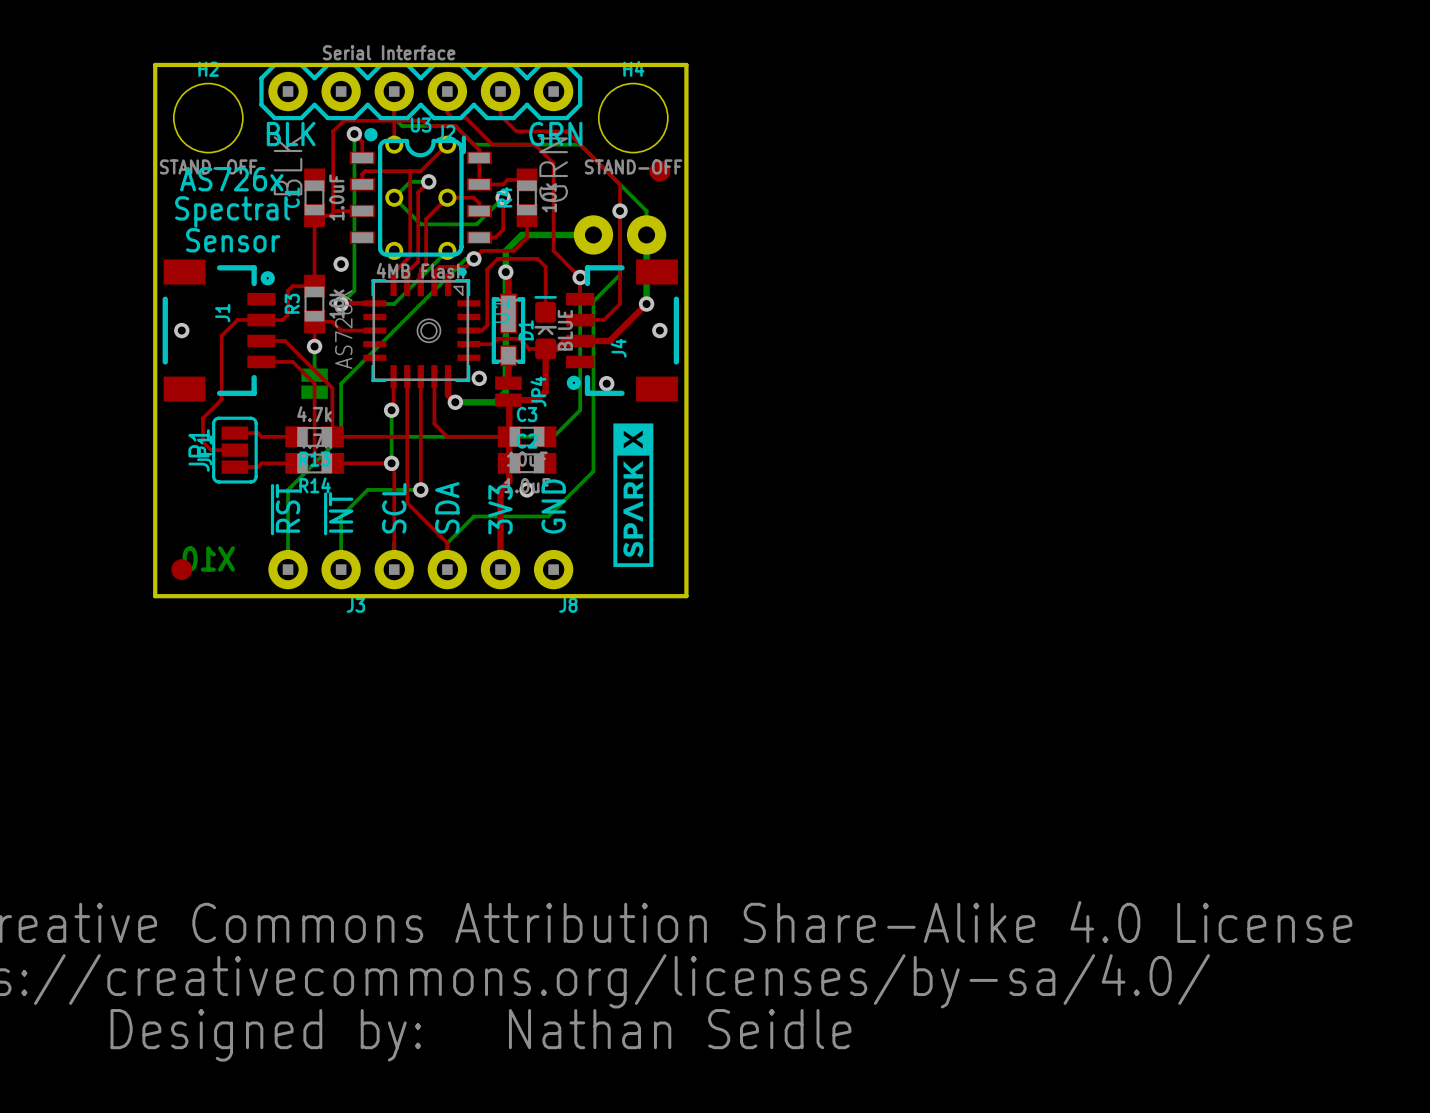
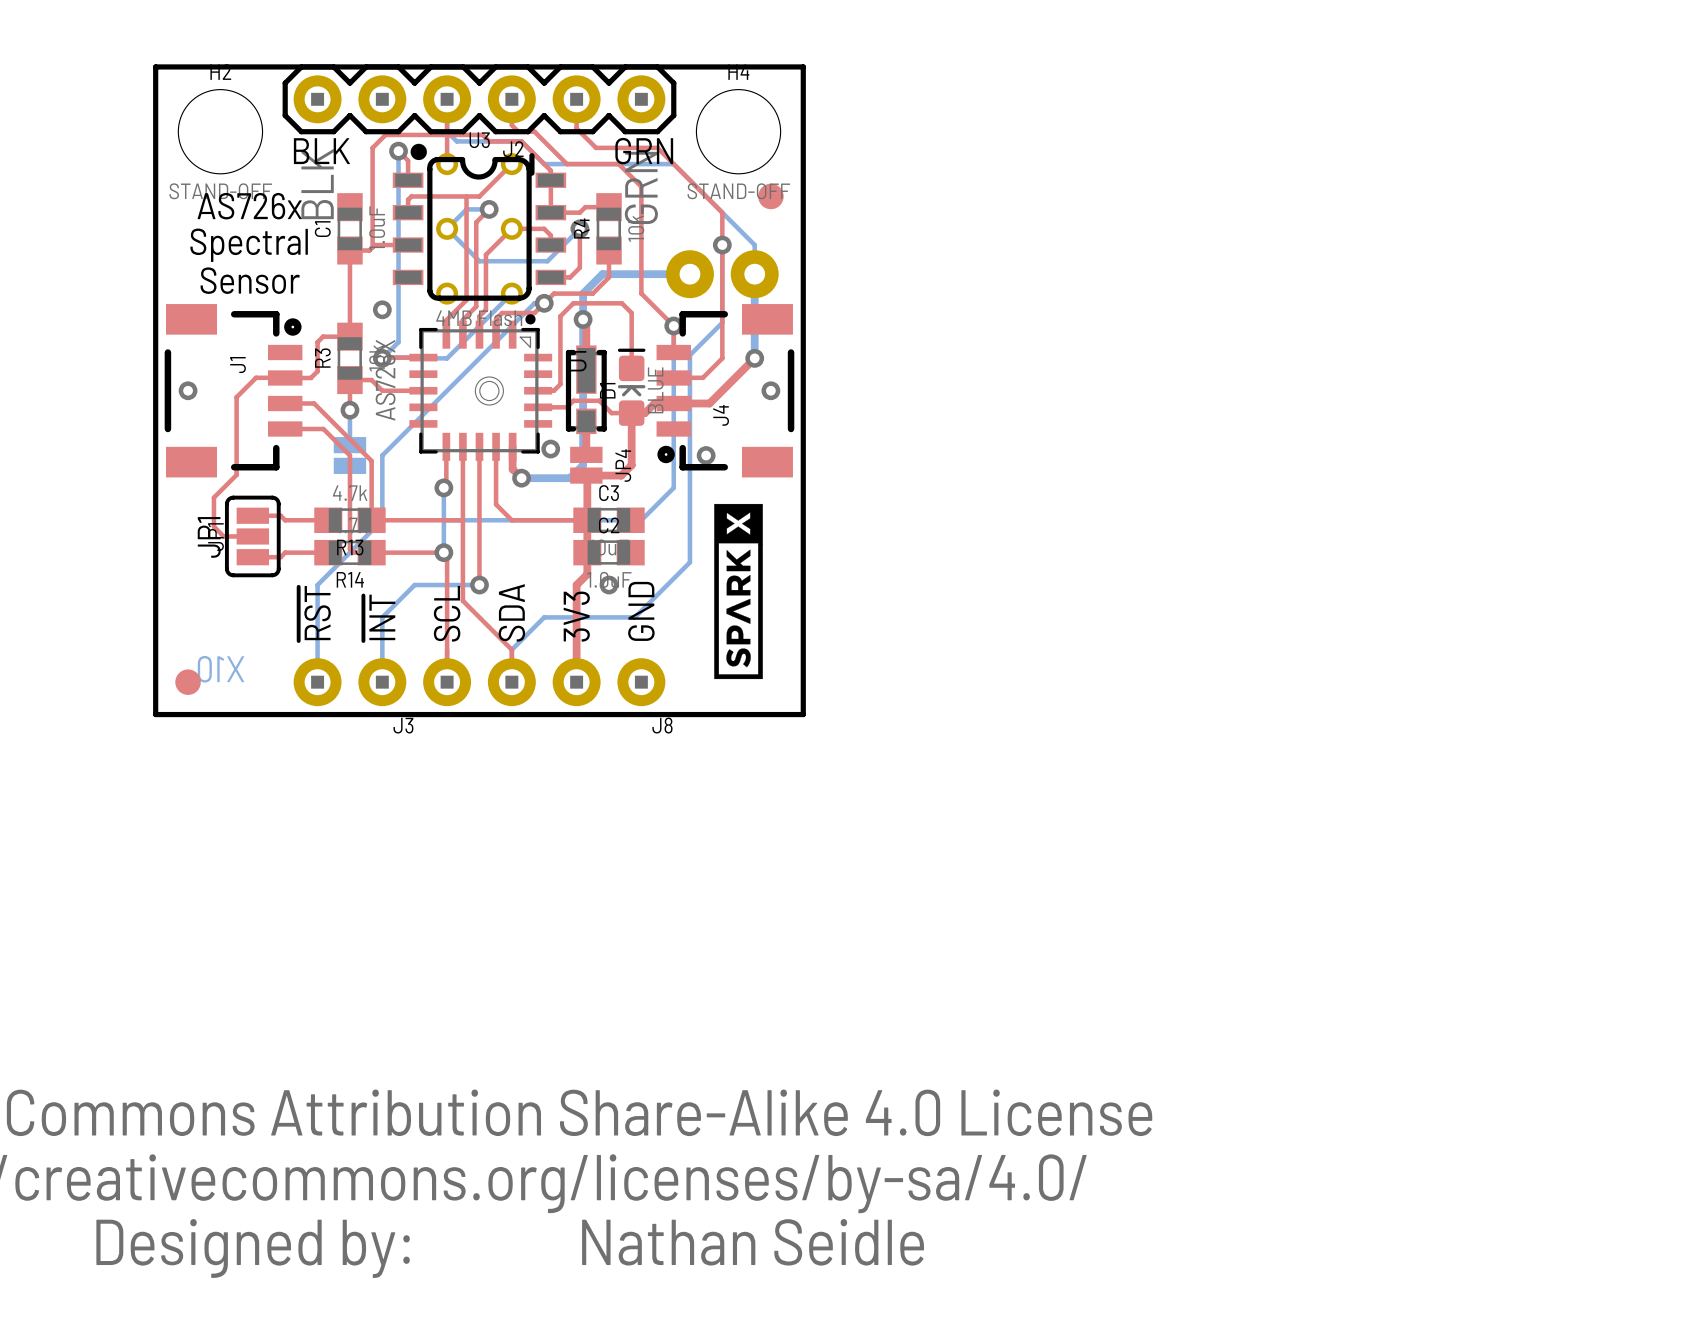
J2 value: Serial Interface (389, 52) -> none

